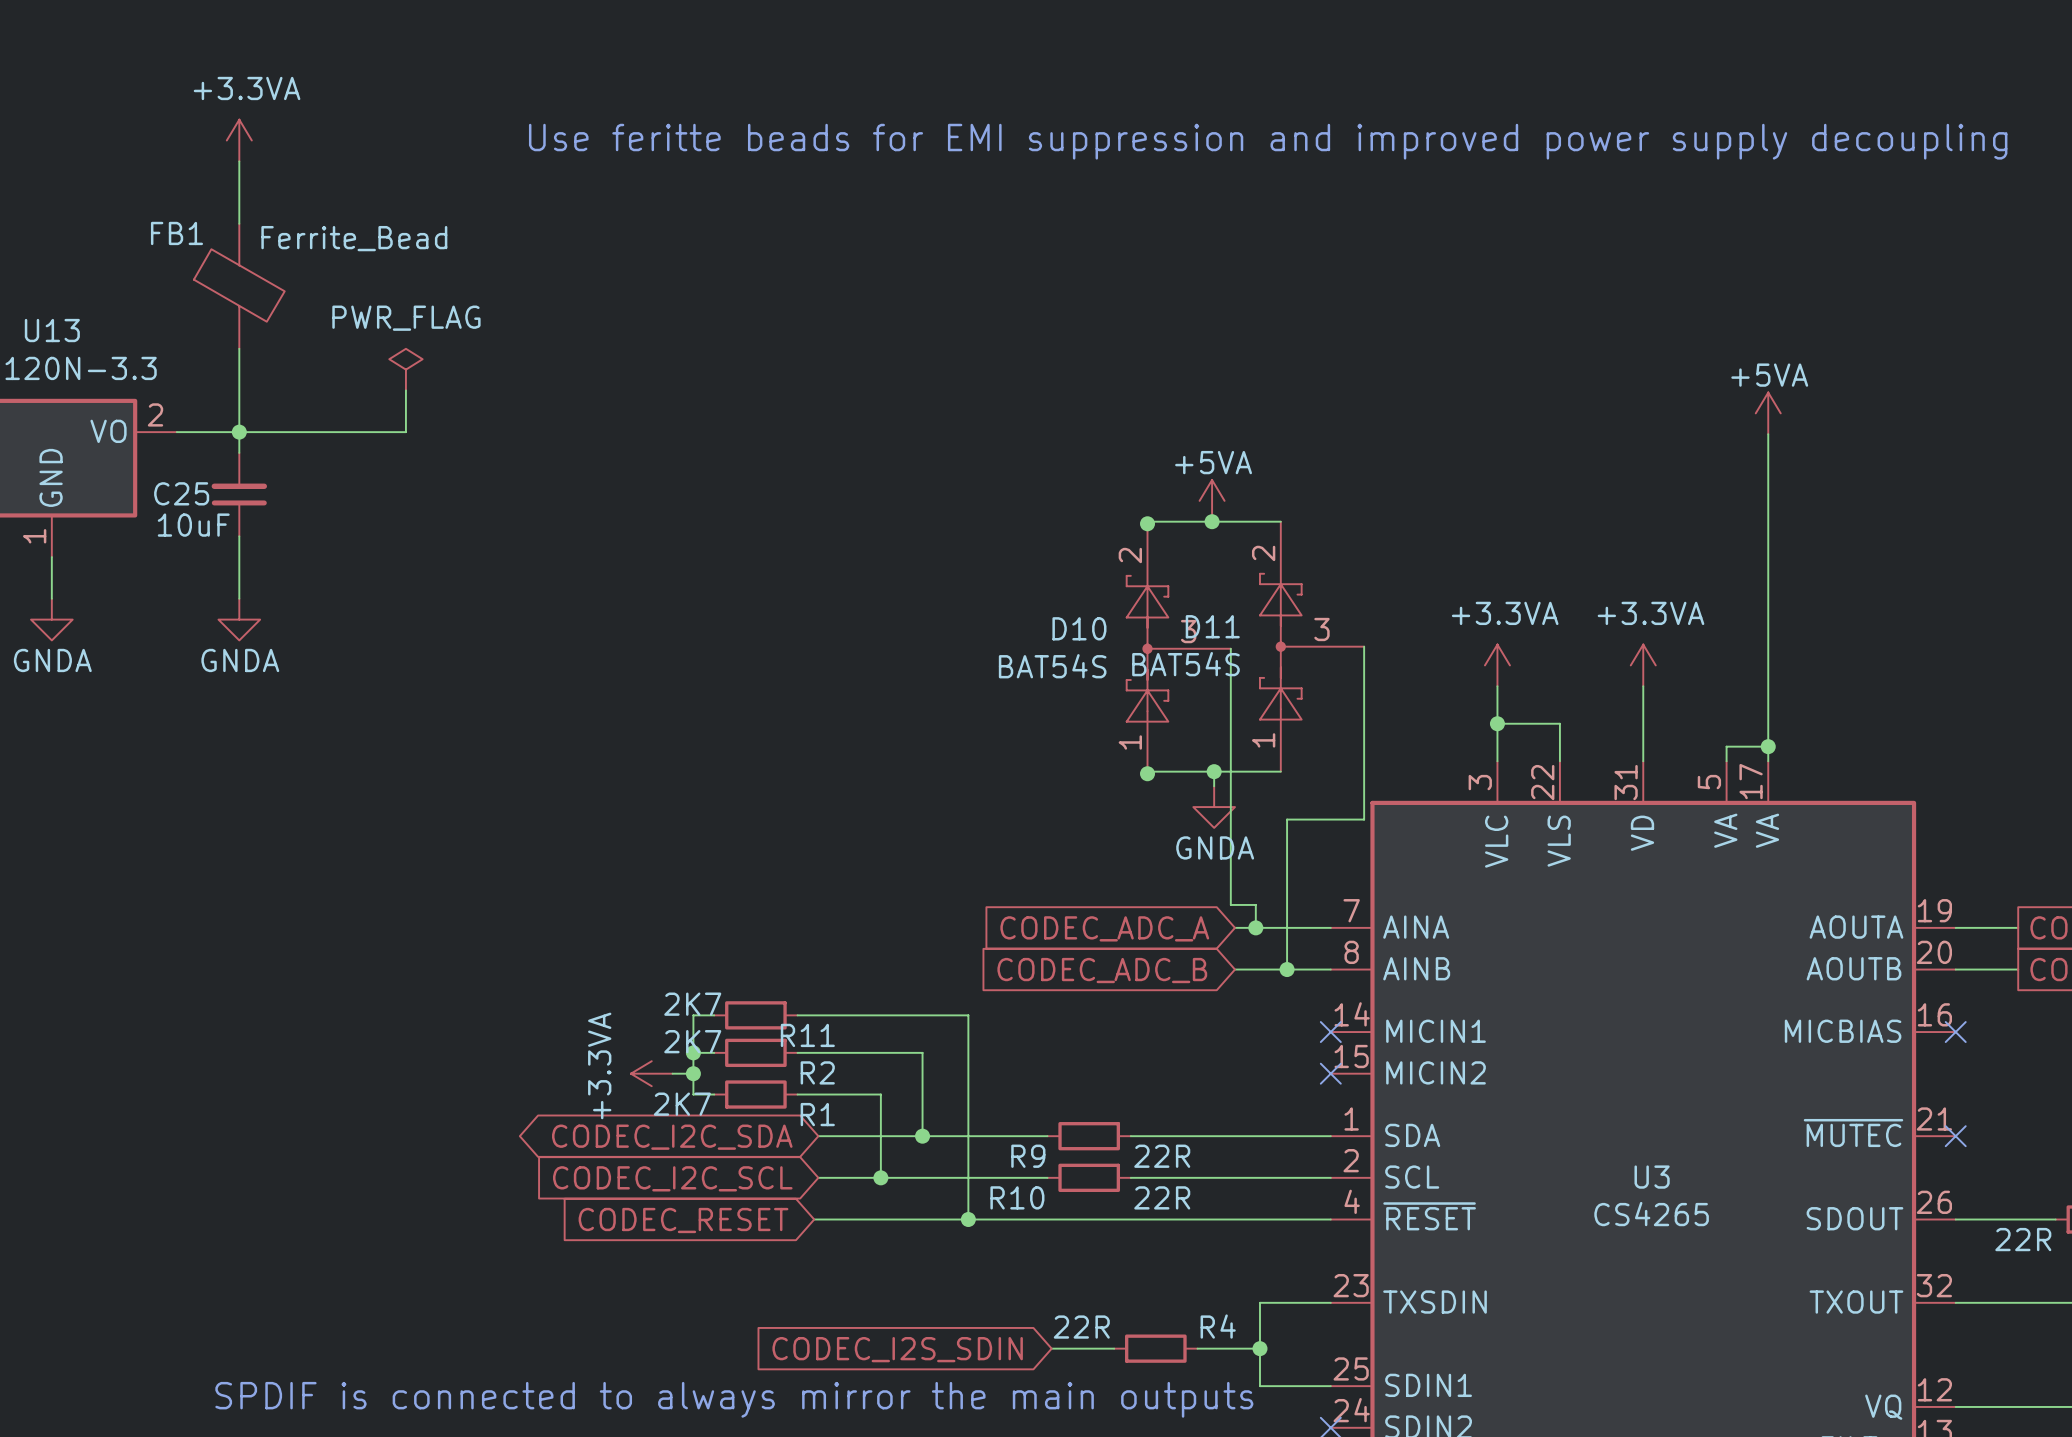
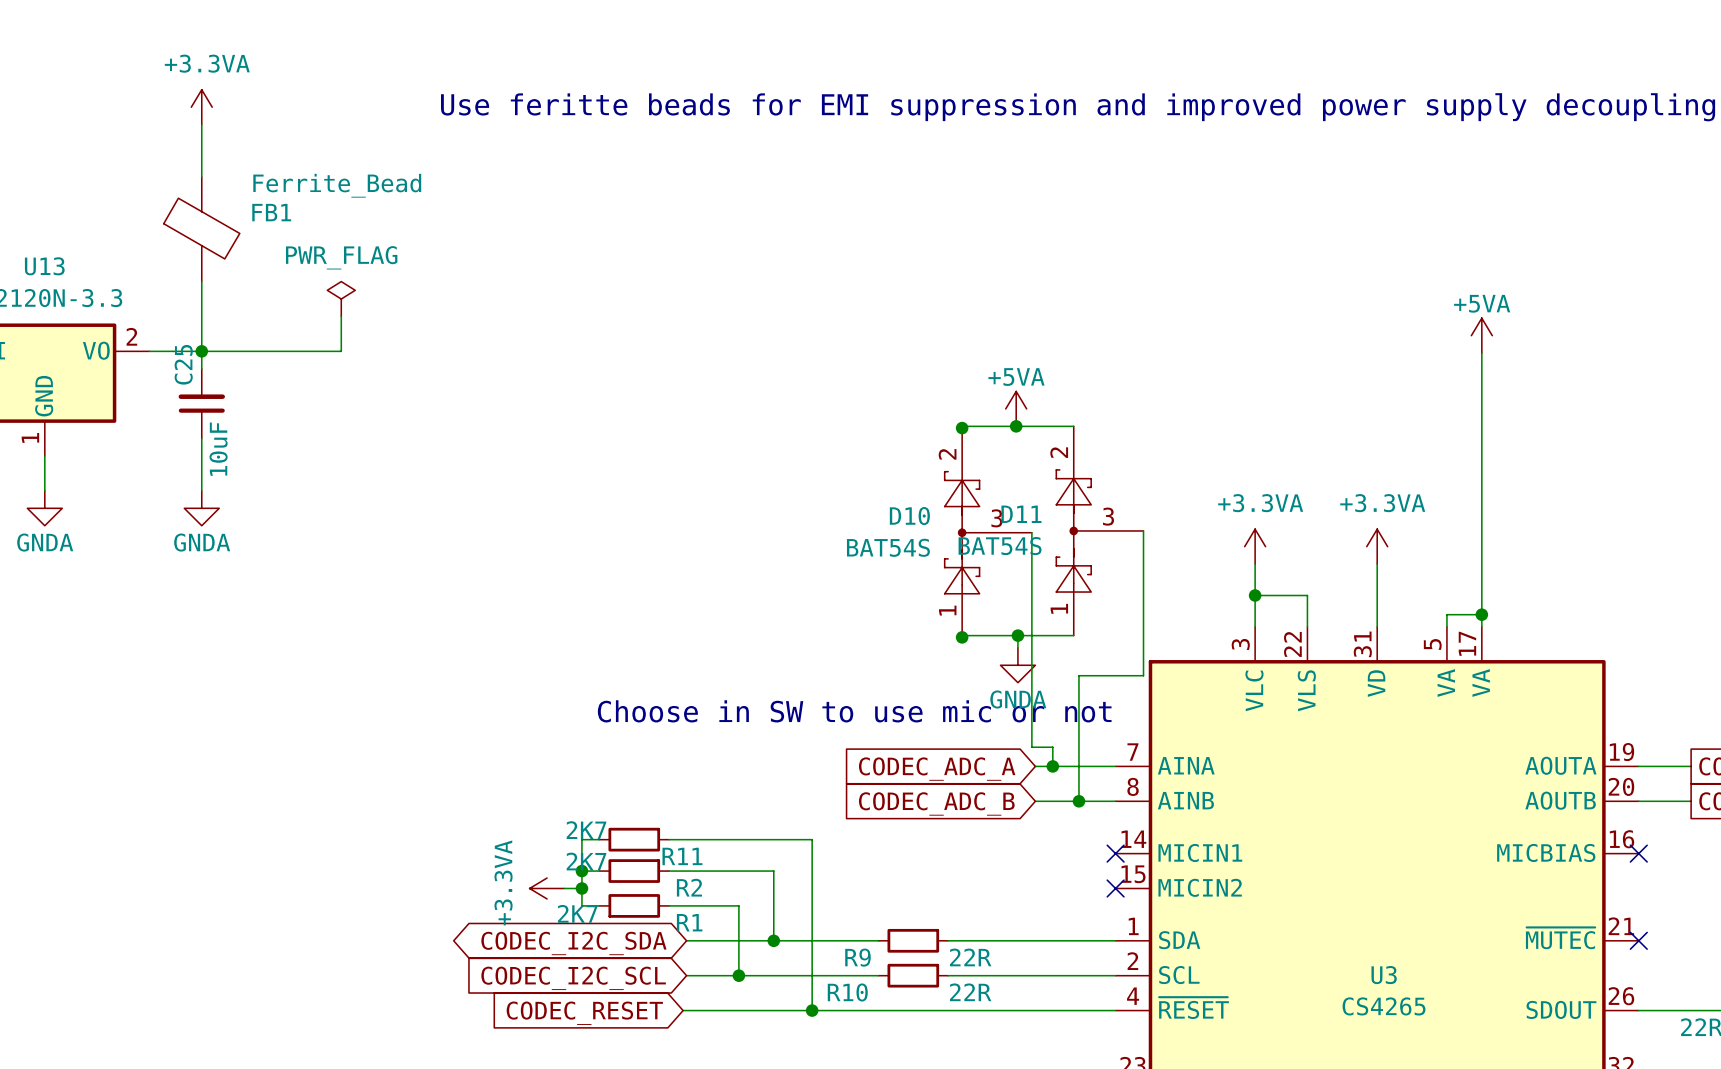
FB1 name position: FB1 (176, 233) -> FB1 (271, 212)
FB1 value position: Ferrite_Bead (354, 238) -> Ferrite_Bead (337, 185)
C25 name rotation: 0° (181, 493) -> 90° counterclockwise (183, 364)
C25 value rotation: 0° (193, 525) -> 90° counterclockwise (218, 449)
text: none -> Choose in SW to use mic or not (854, 711)

